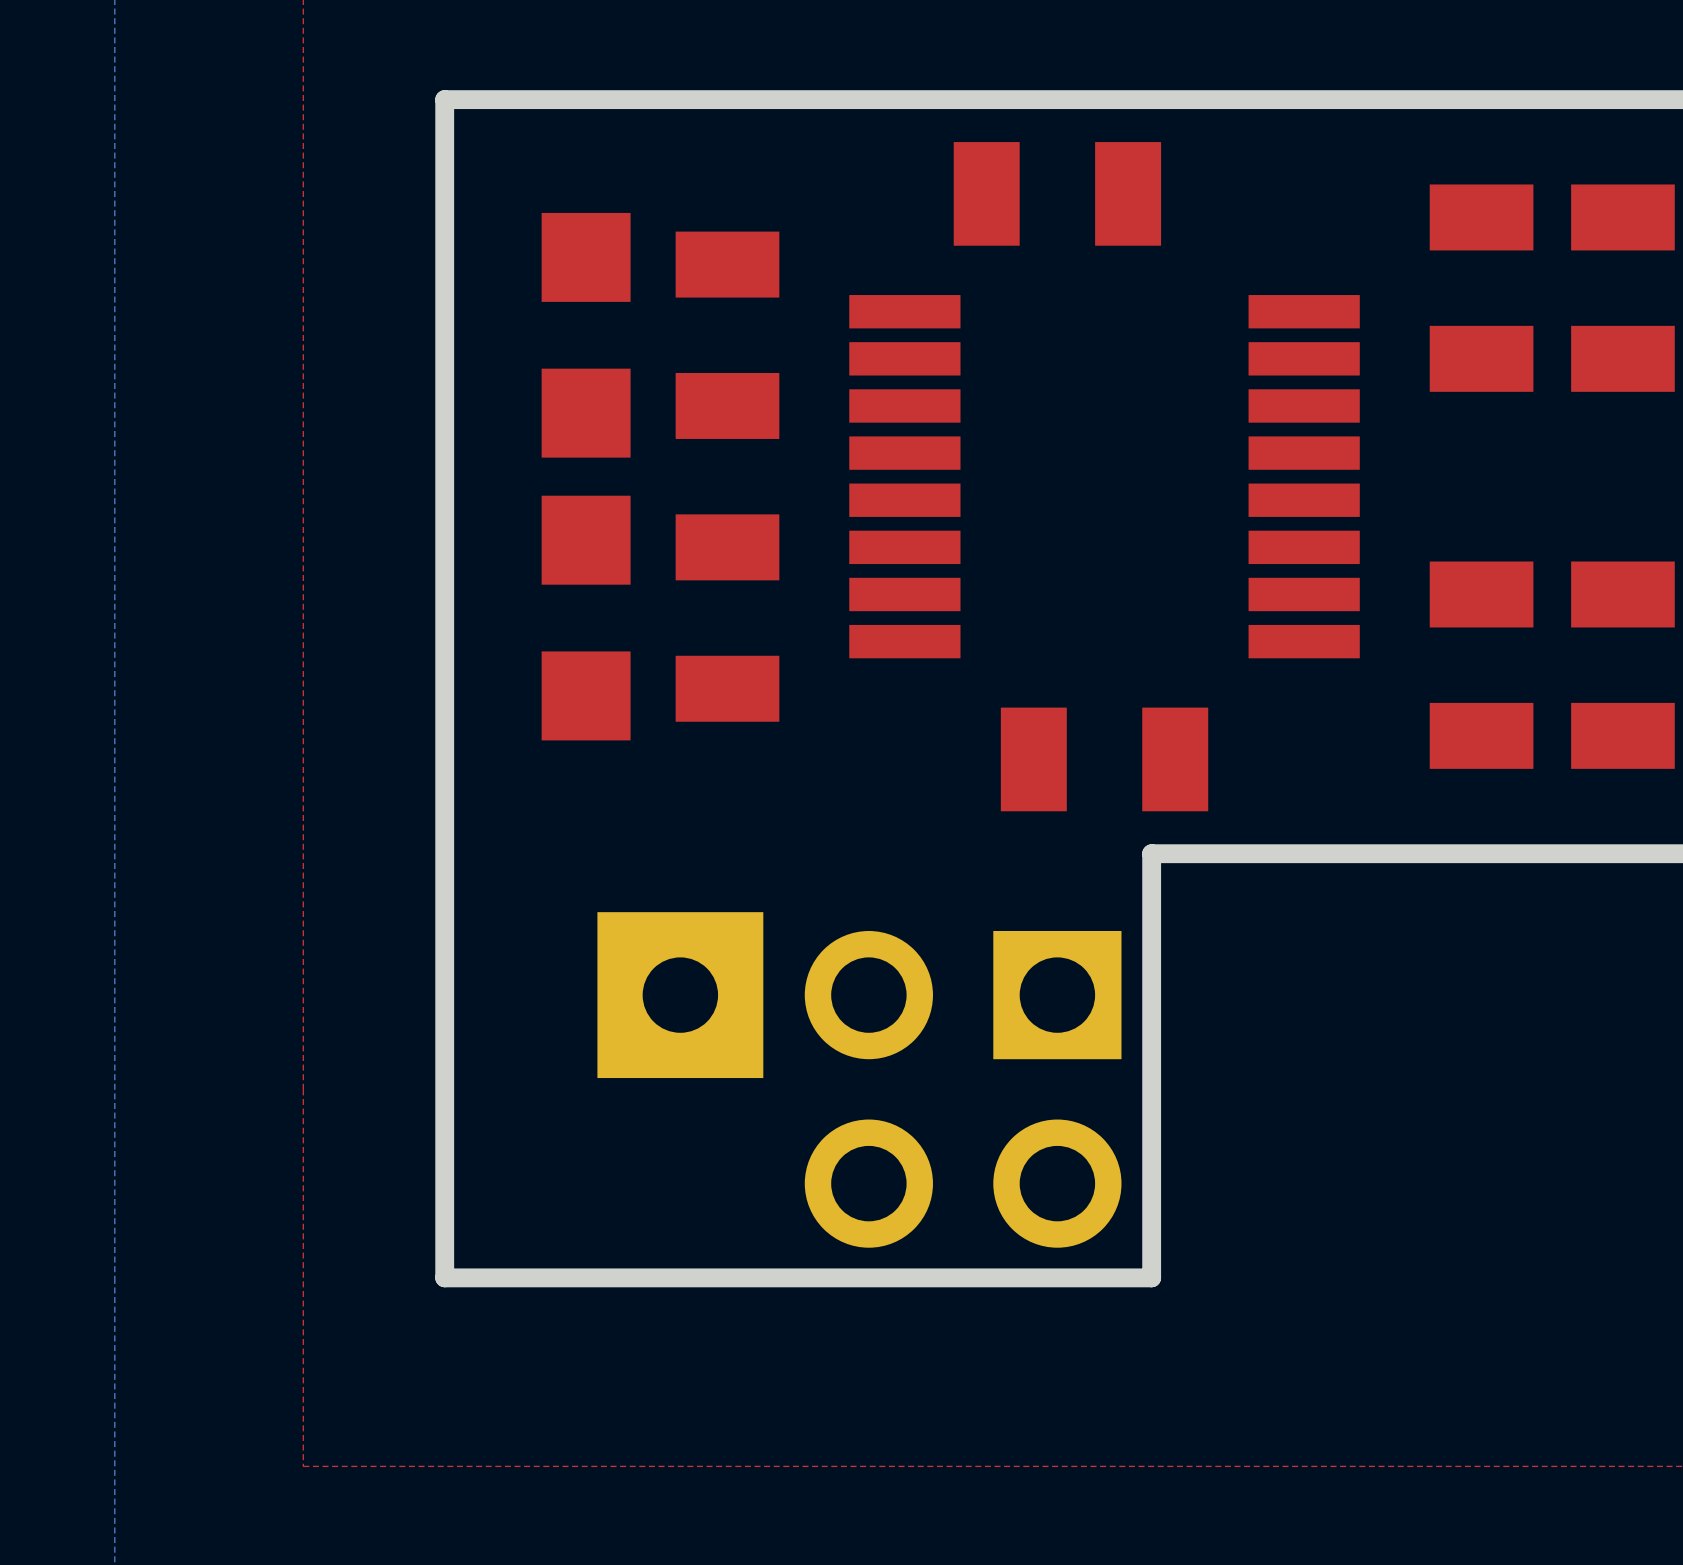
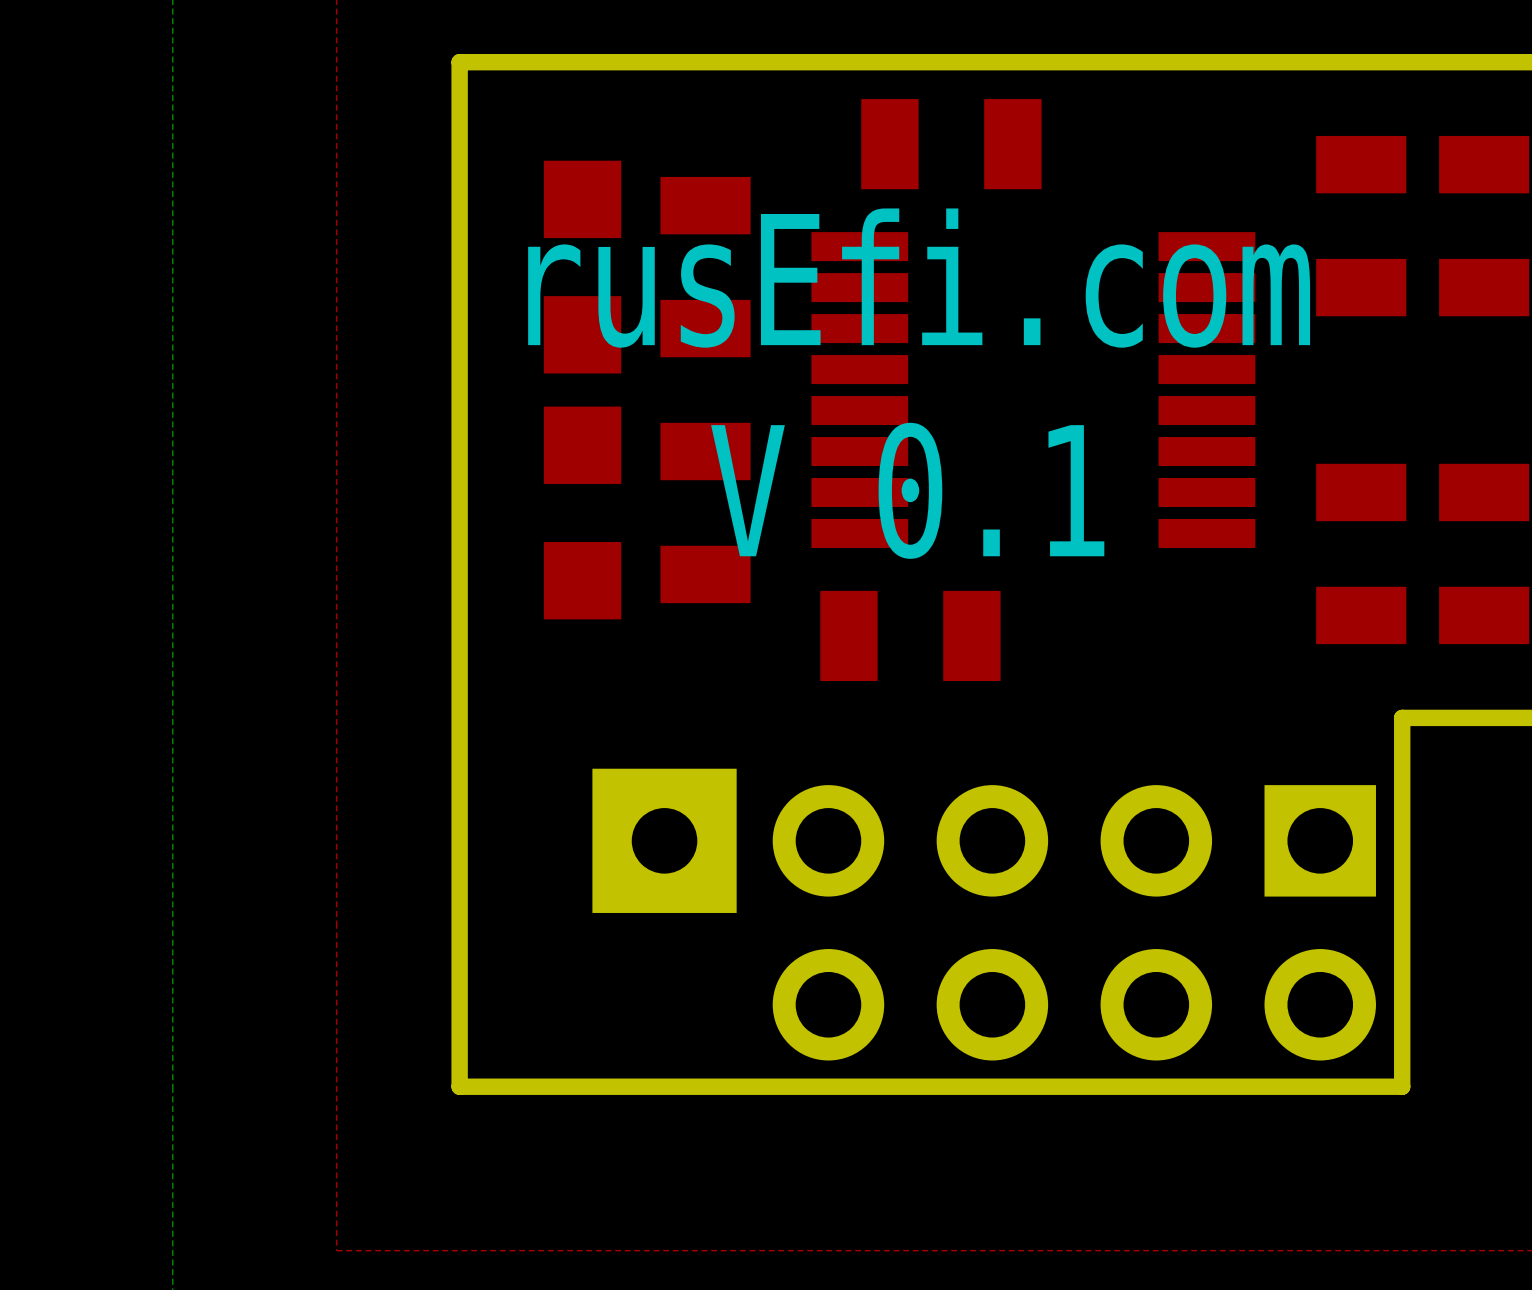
part position: (1057, 193) -> (951, 144)
text: none -> rusEfi.com (919, 278)
text: none -> V 0.1 (907, 490)
part position: (1104, 759) -> (910, 635)
board edge: (1528, 853) (1151, 853) (1151, 1277) -> (1402, 717) (1402, 1086) (1074, 1086)
part: (963, 1089) -> none
part: none -> (1074, 922)

